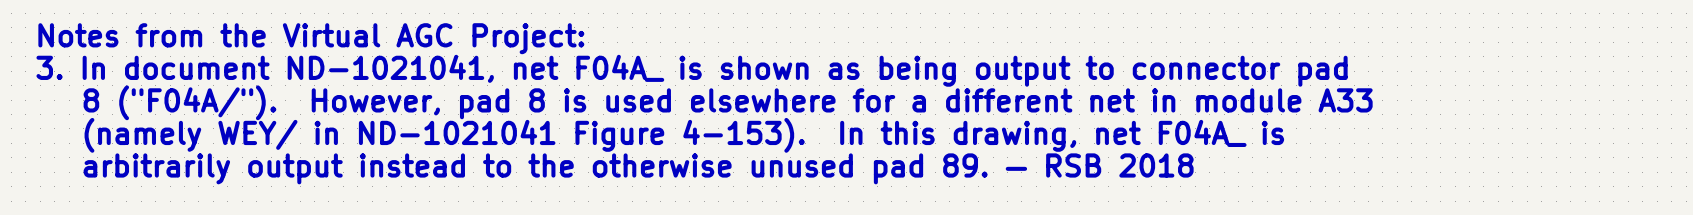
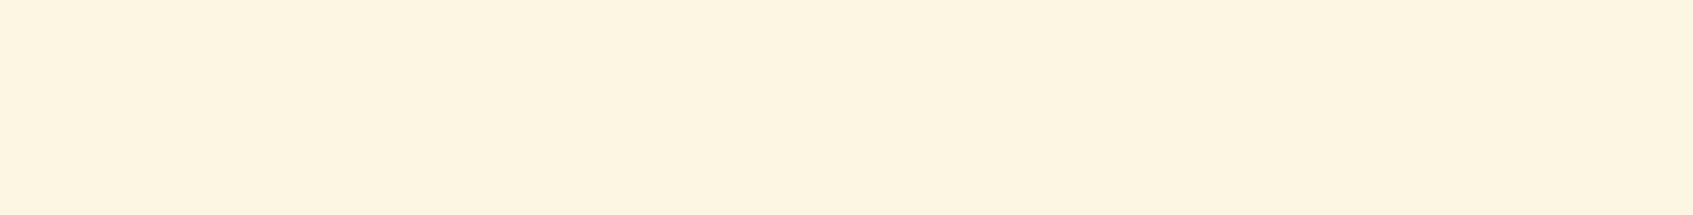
text: Notes from the Virtual AGC Project: (311, 38) -> none
text: 3. In document ND-1021041, net F04A_ is shown as being output to connector pad (692, 70) -> none
text: 8 ("F04A/"). However, pad 8 is used elsewhere for a different net in module A33 (728, 102) -> none
text: (namely WEY/ in ND-1021041 Figure 4-153). In this drawing, net F04A_ is (684, 135) -> none
text: arbitrarily output instead to the otherwise unused pad 89. — RSB 2018 (638, 168) -> none

